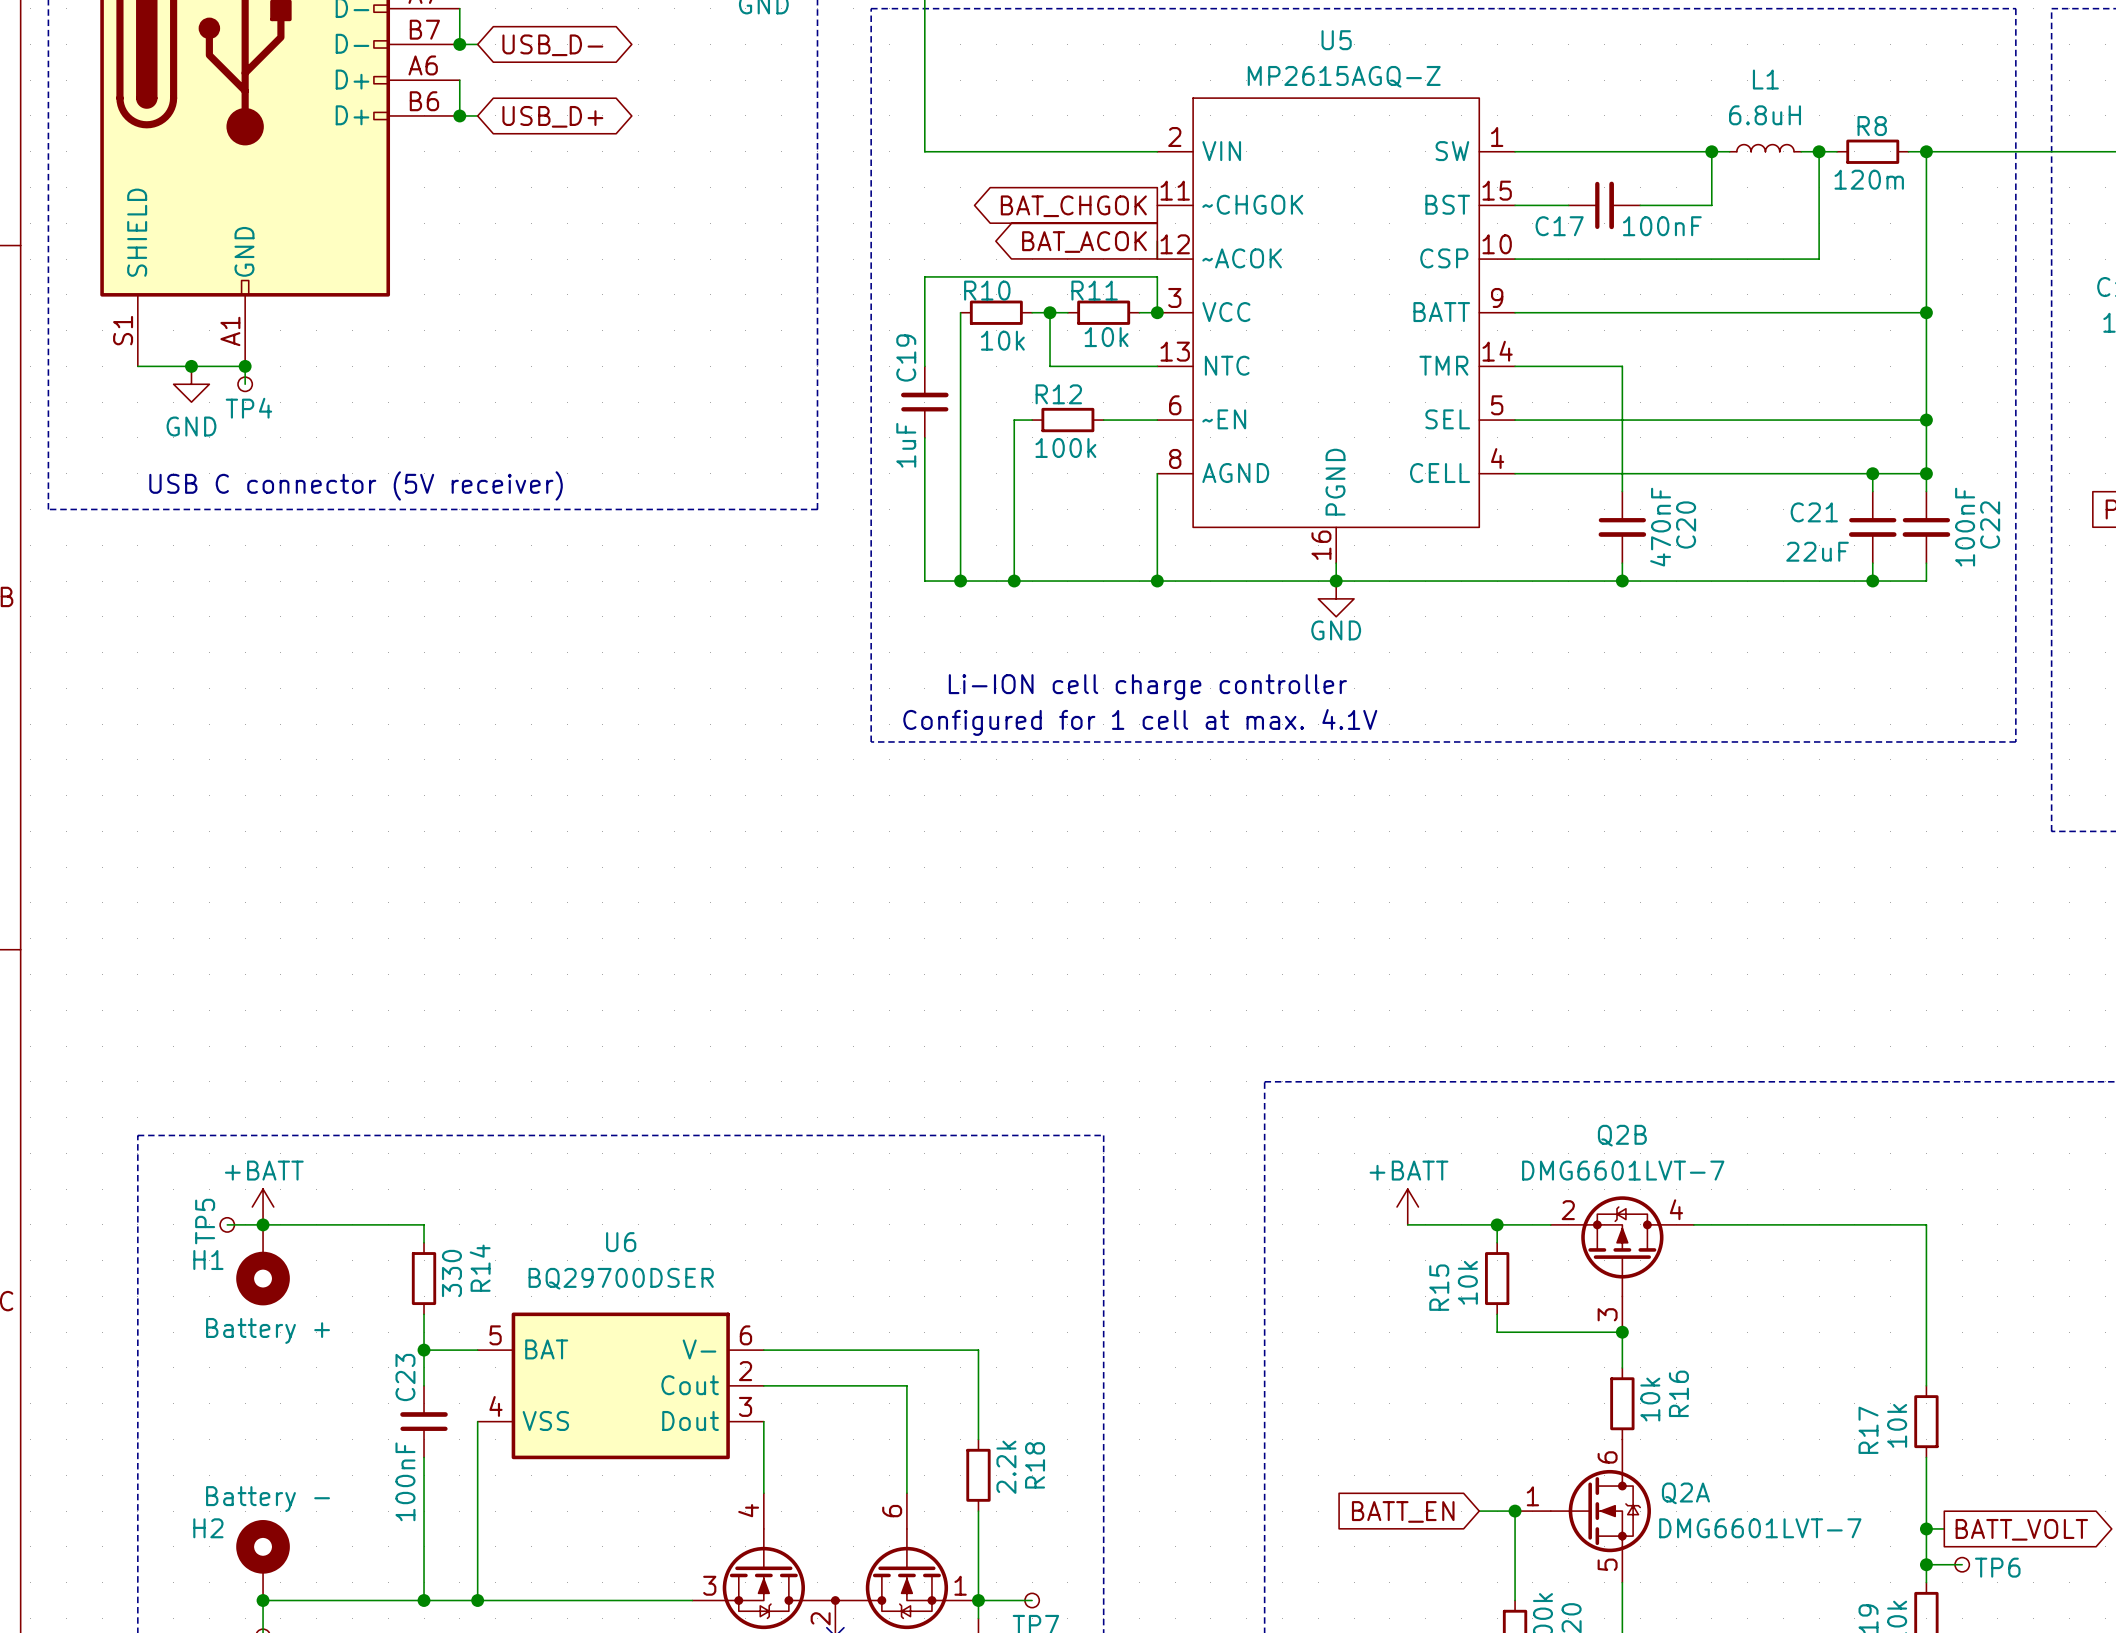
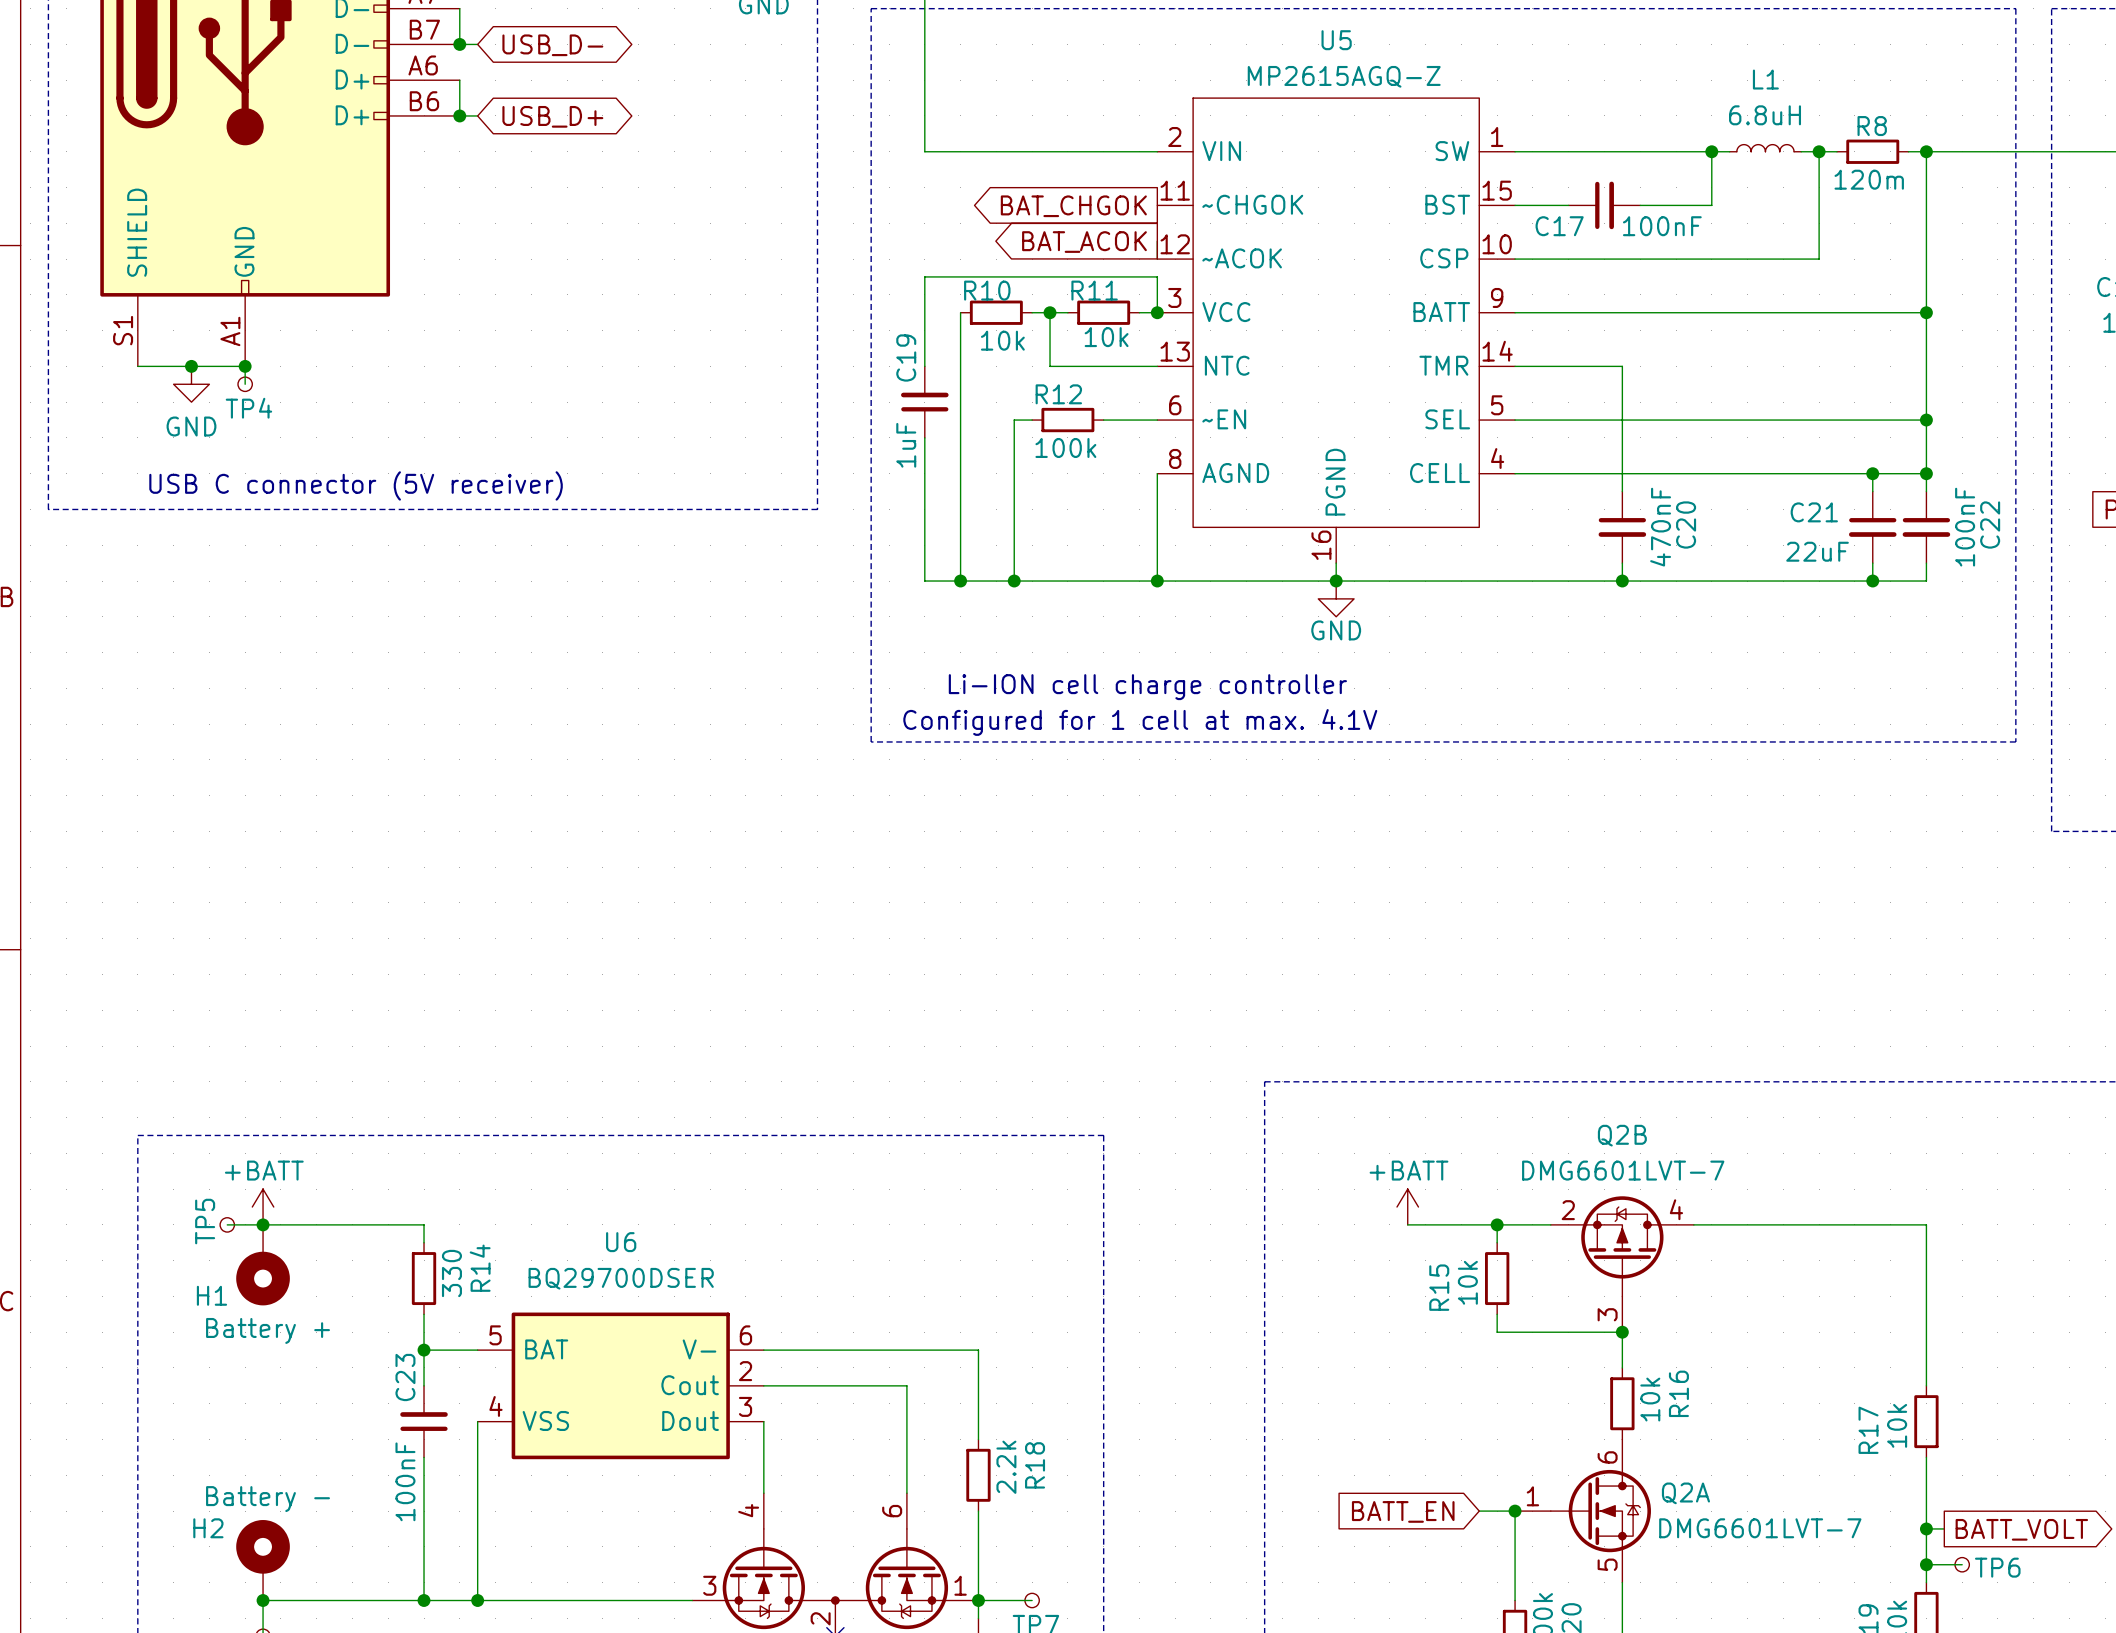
H1 name position: H1 (208, 1260) -> H1 (211, 1295)

